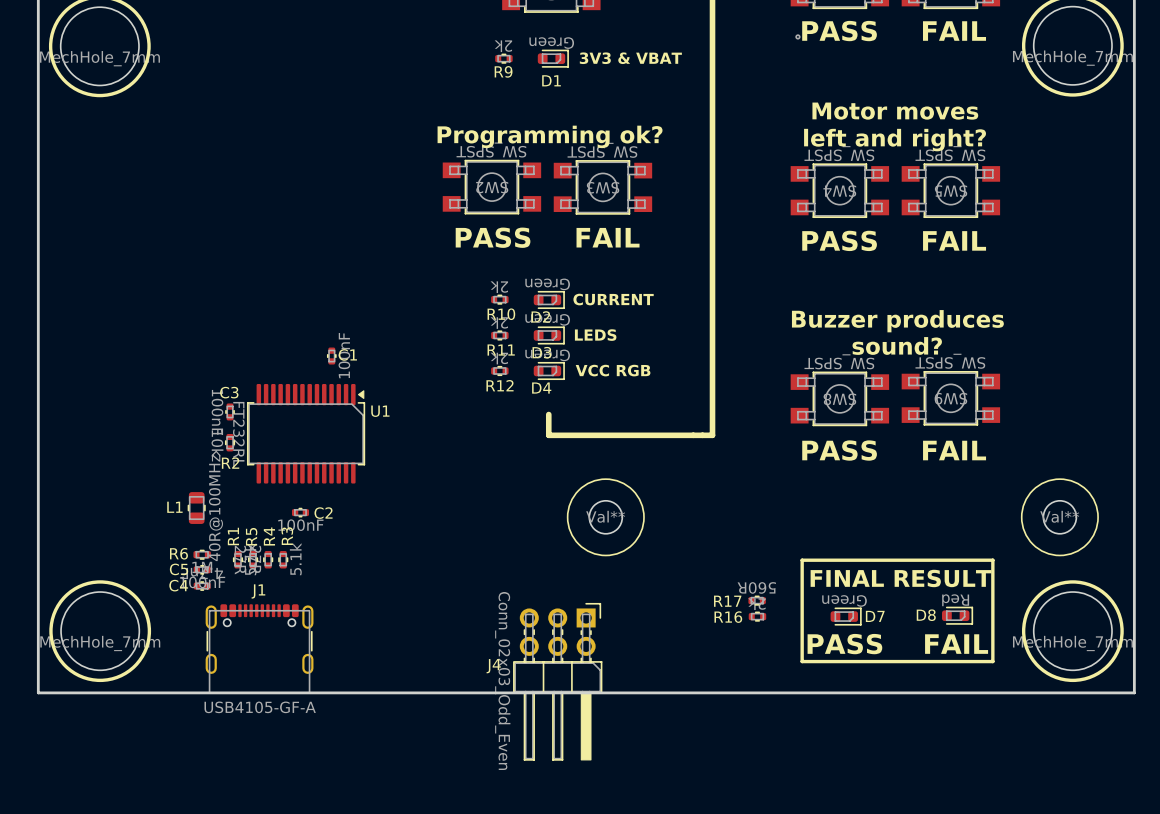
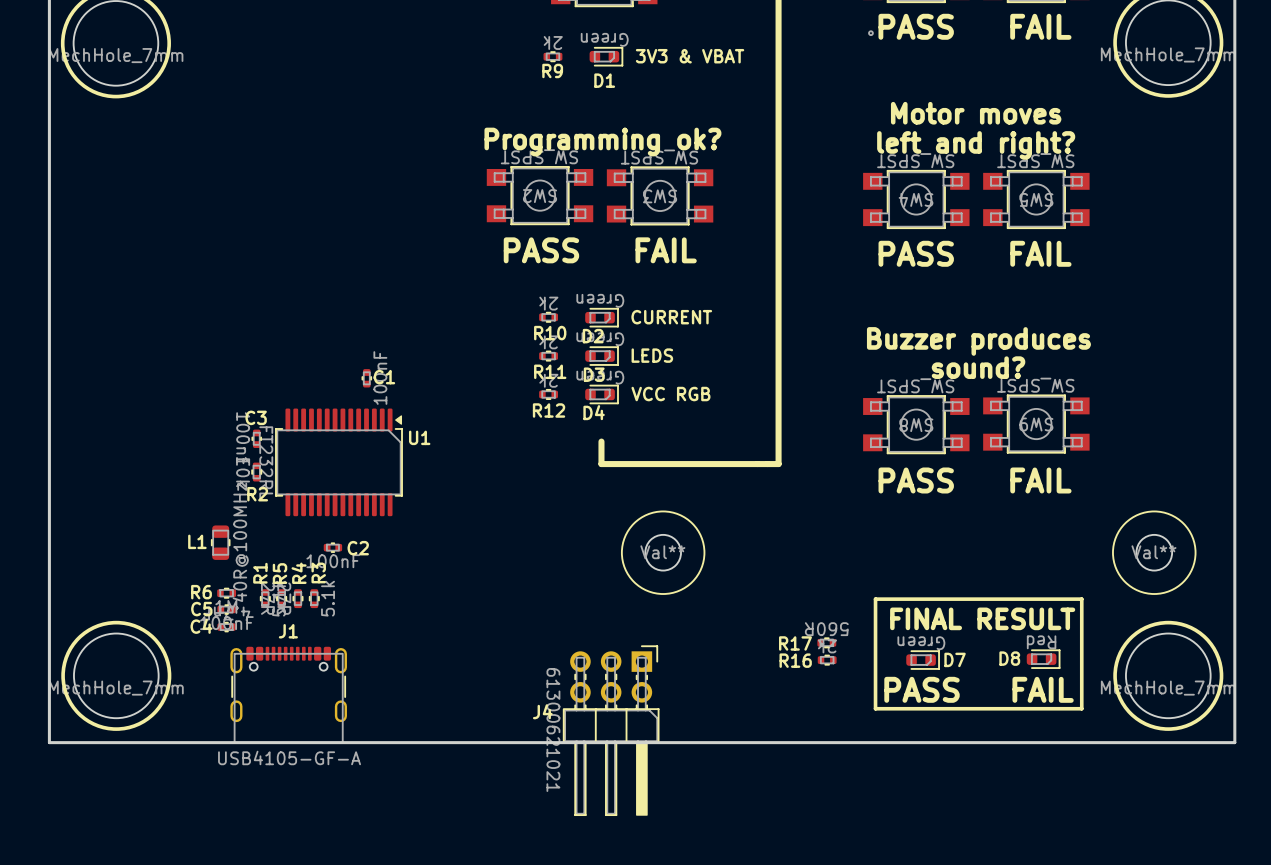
J4 value: Conn_02x03_Odd_Even (502, 680) -> 61300621021 (553, 729)

